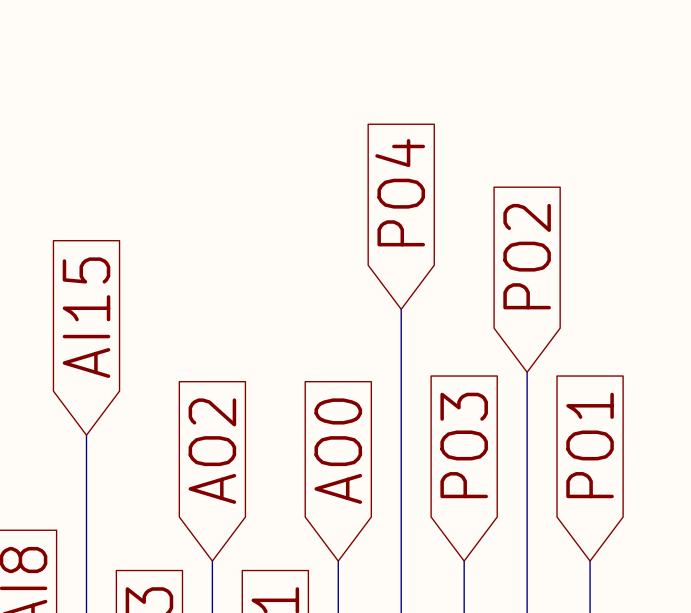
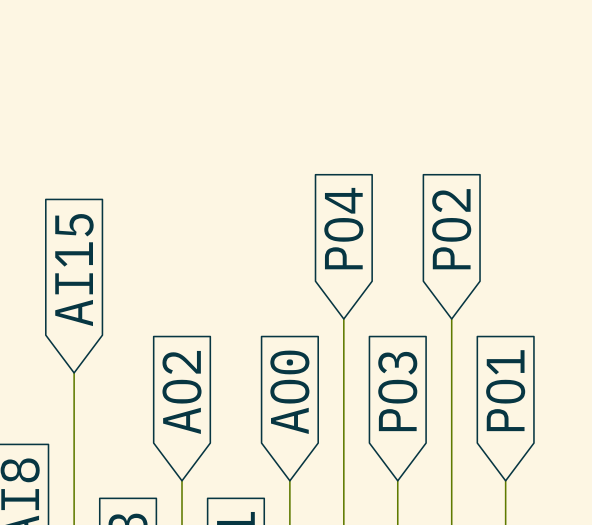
global label position: PO4 (400, 192) -> PO4 (343, 228)
wire: (401, 309) (401, 372) -> none

